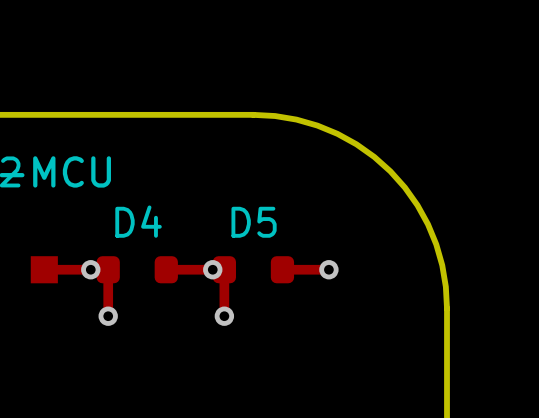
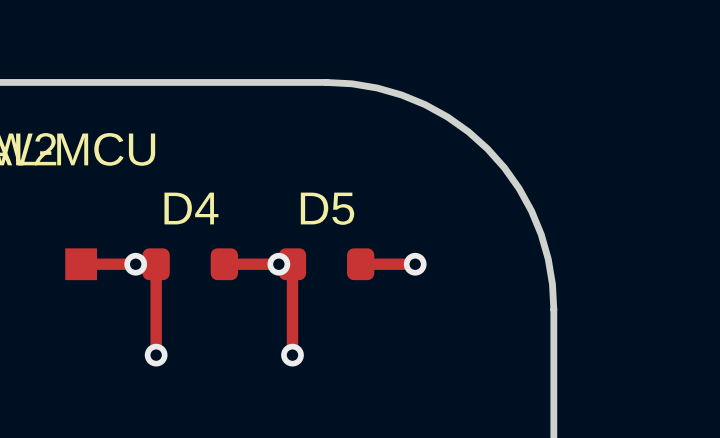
track: none -> (156, 318) (156, 355)
via position: (108, 316) -> (156, 355)
track: none -> (292, 318) (292, 355)
via position: (224, 316) -> (292, 355)

